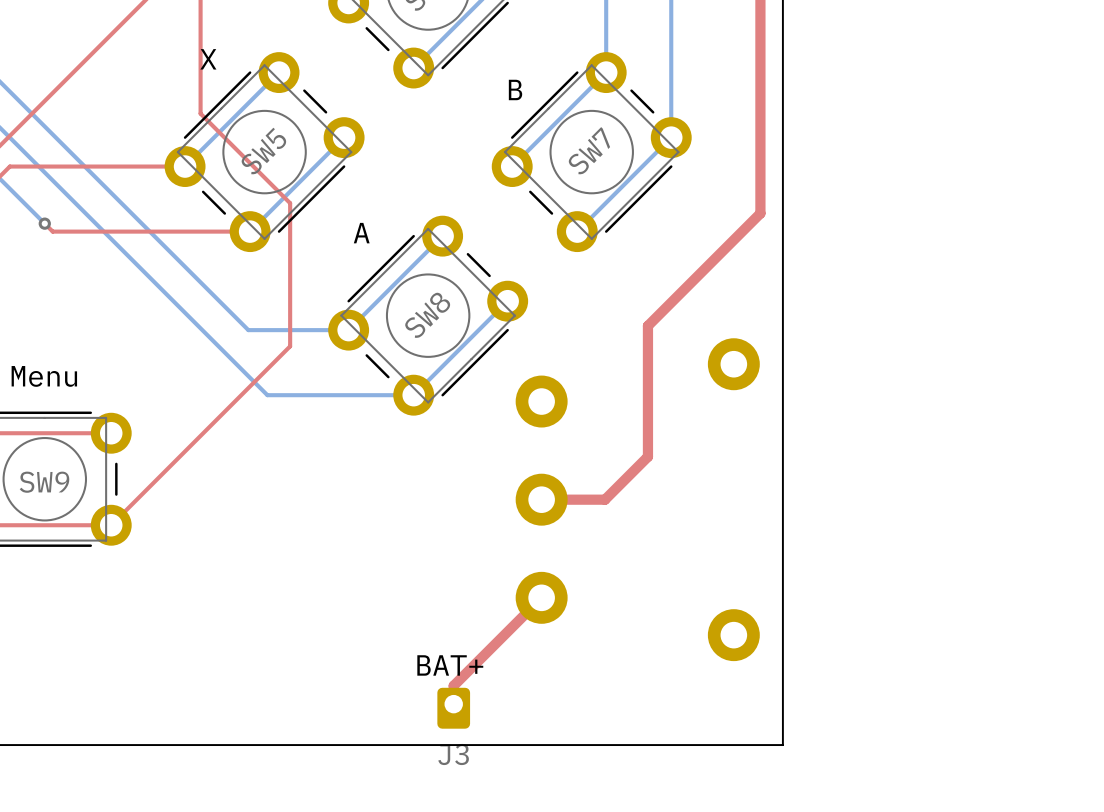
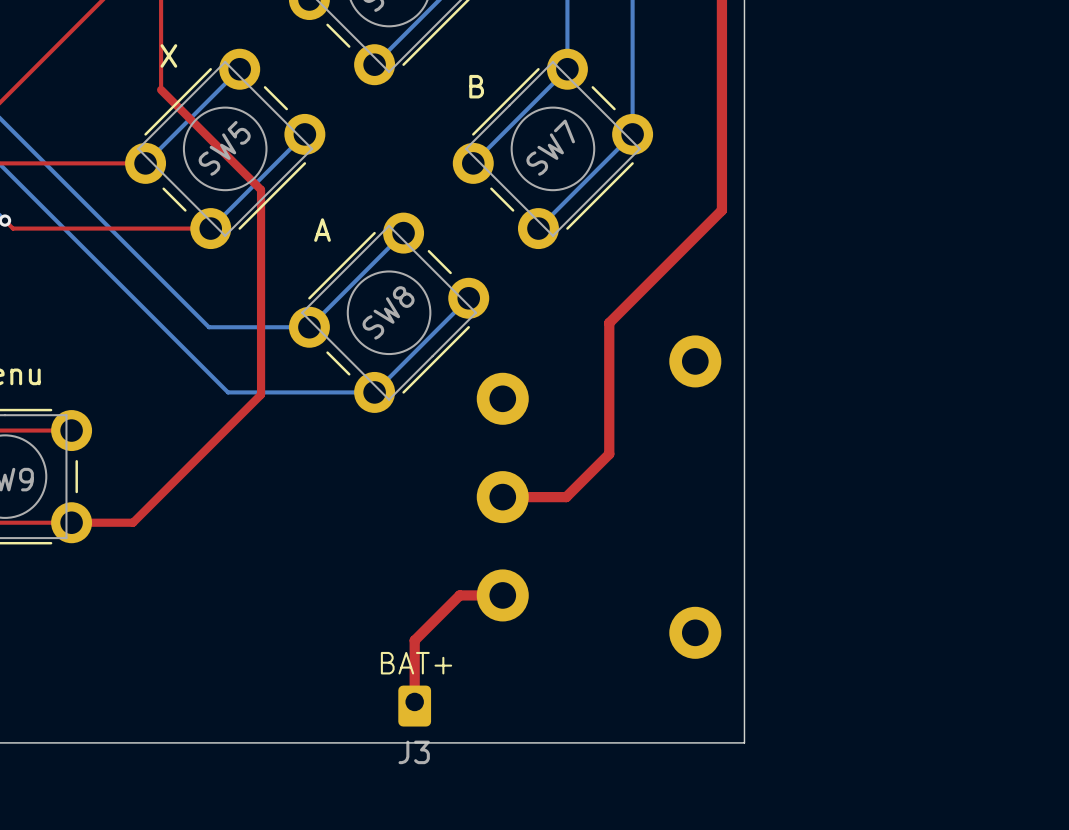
top track: (200, 93) (200, 113) (290, 203) (290, 346) (111, 525) -> (161, 89) (261, 189) (261, 394) (133, 522) (71, 522)
top track: (541, 597) (453, 685) -> (502, 595) (459, 595) (414, 640) (414, 683)

